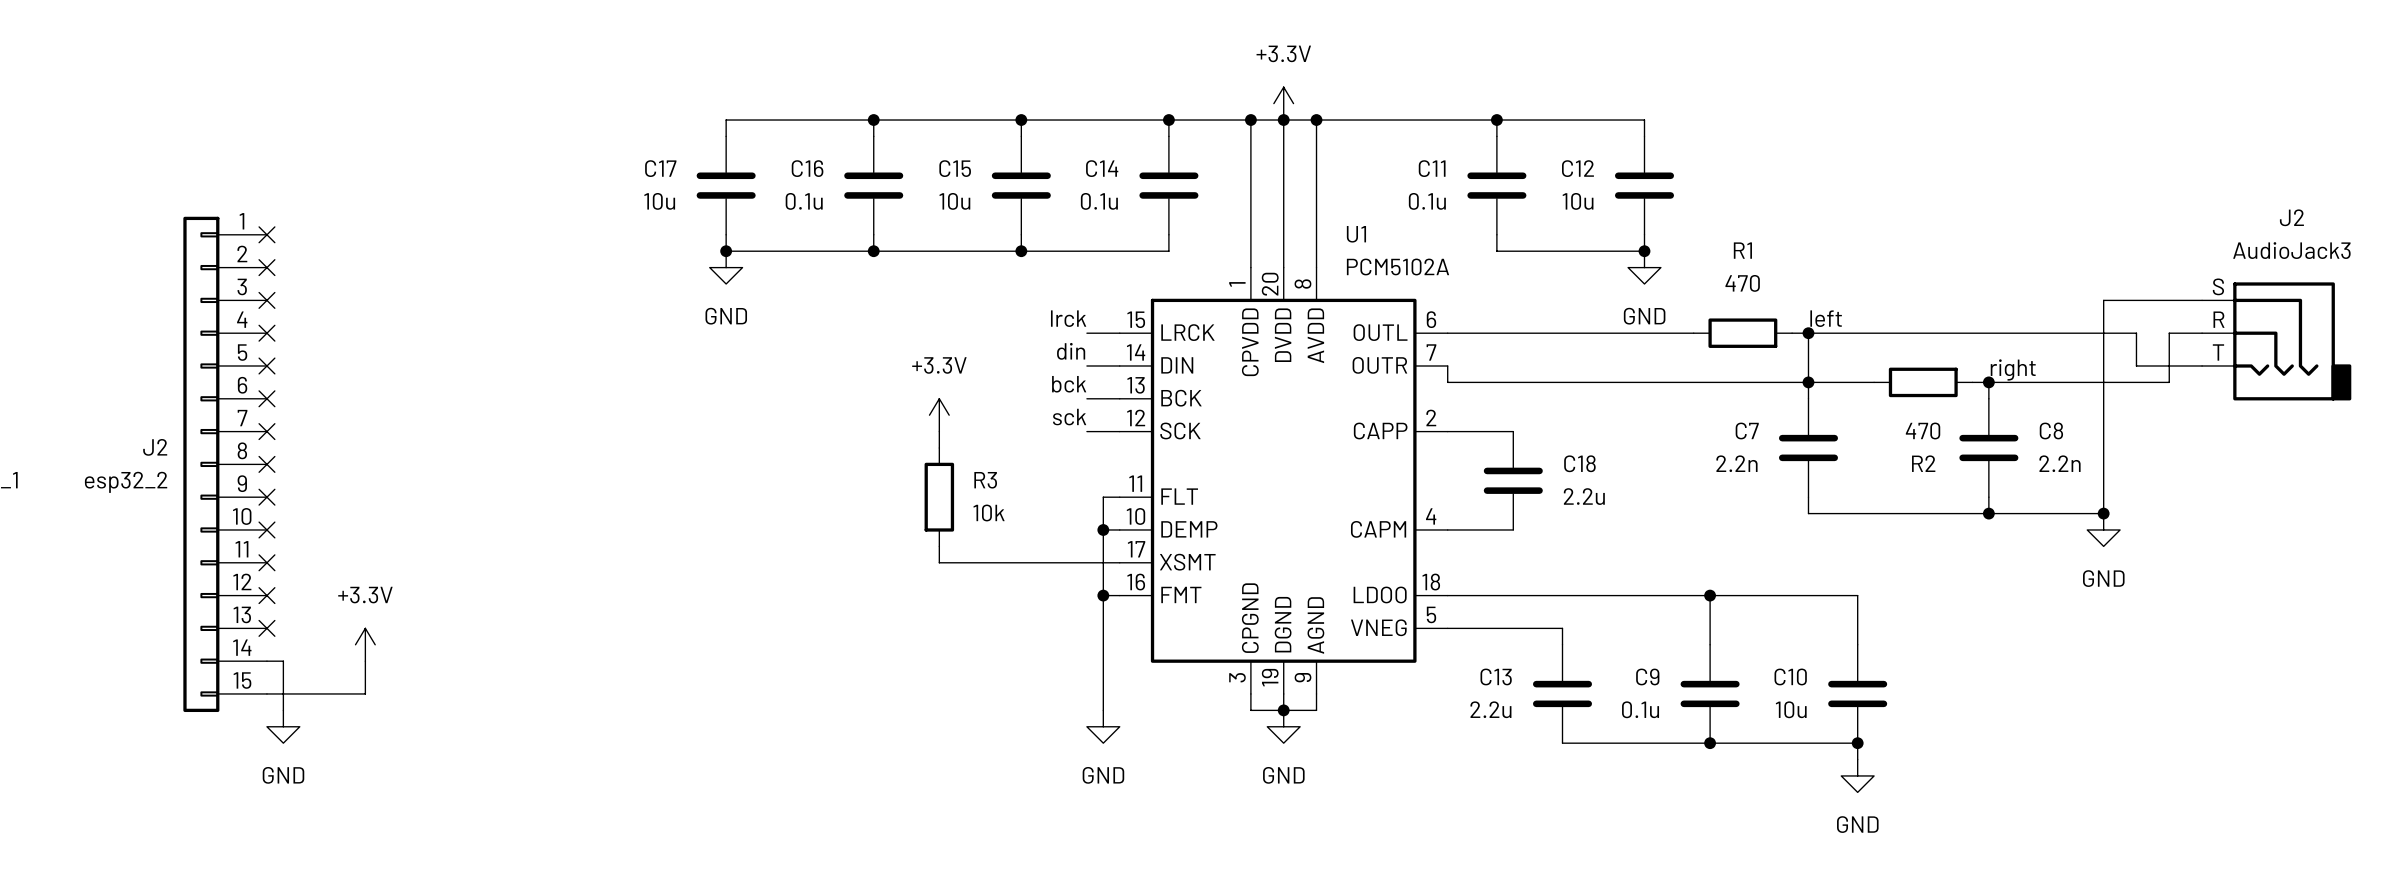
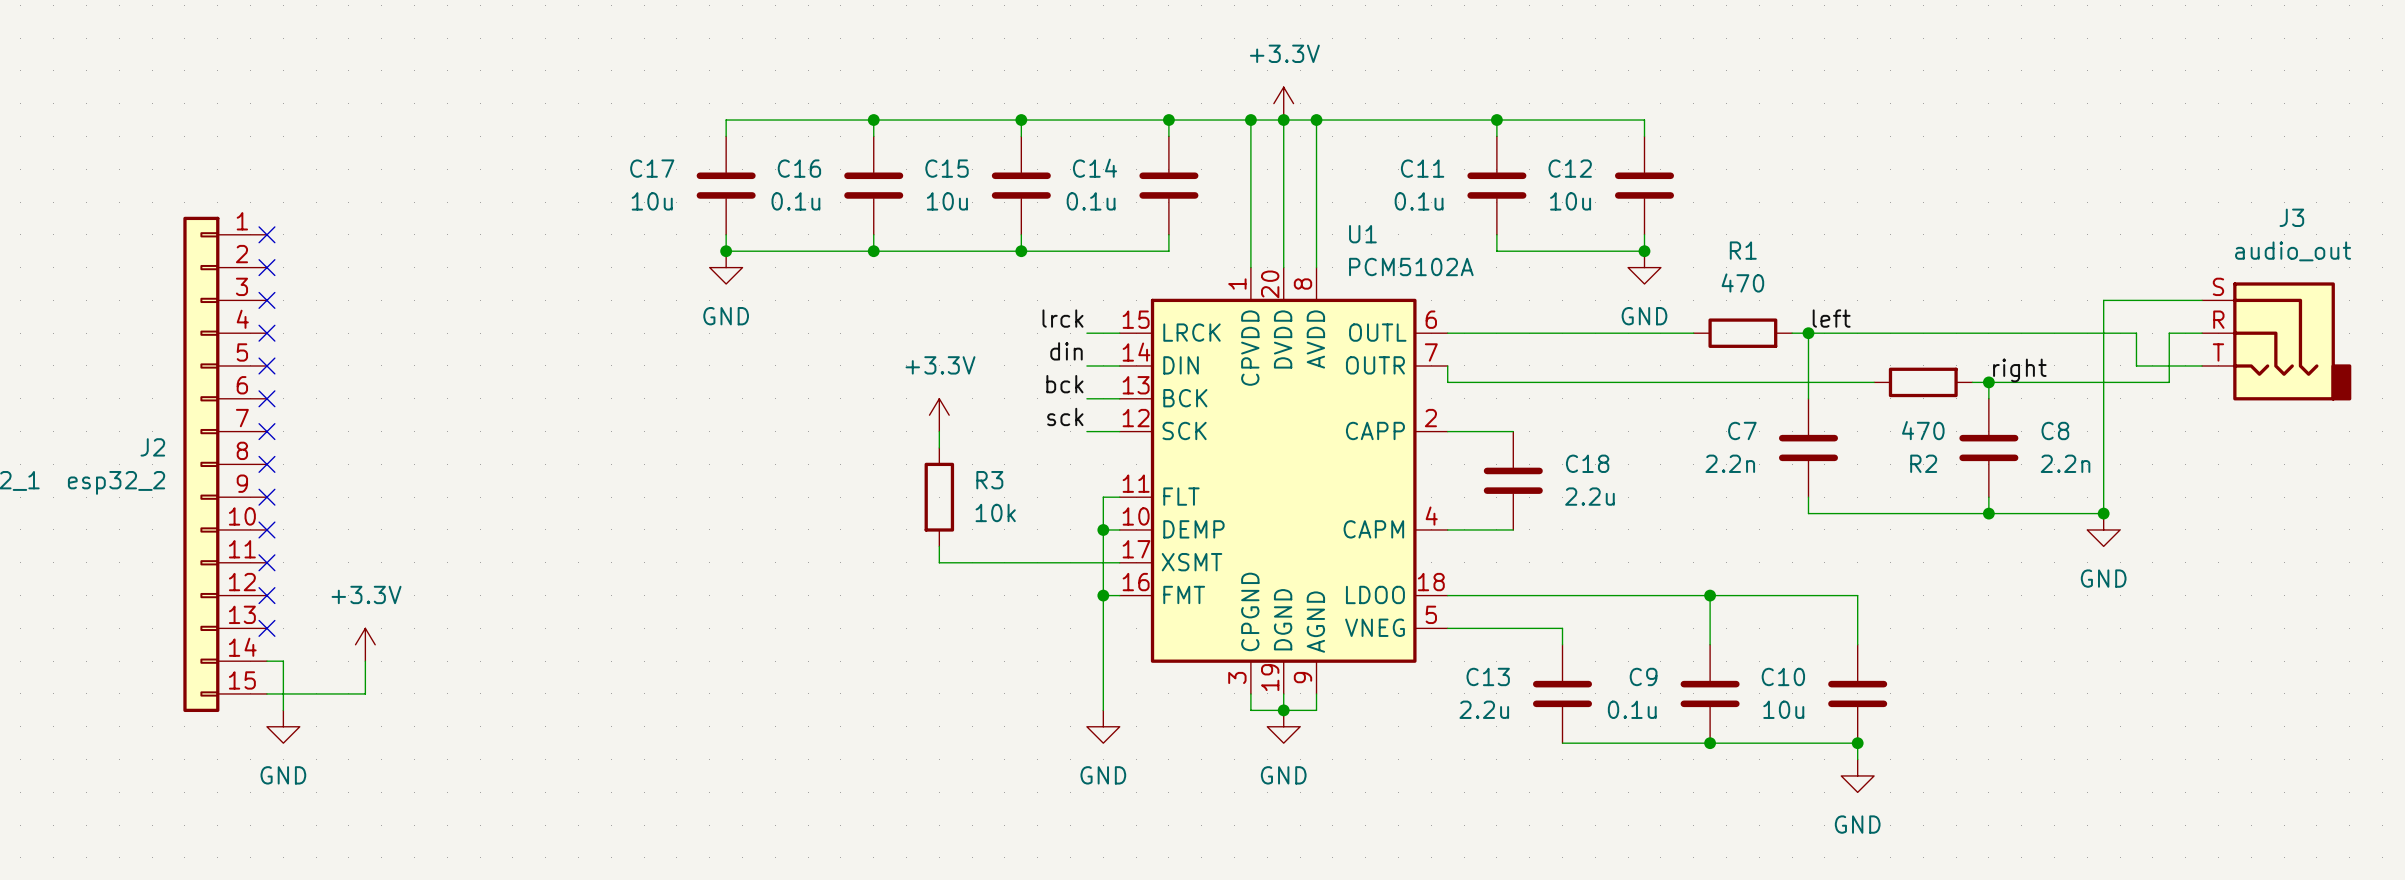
J2 name: J2 (2291, 217) -> J3 (2291, 217)
J2 value: AudioJack3 (2291, 250) -> audio_out (2293, 251)
junction: (1808, 382) -> none

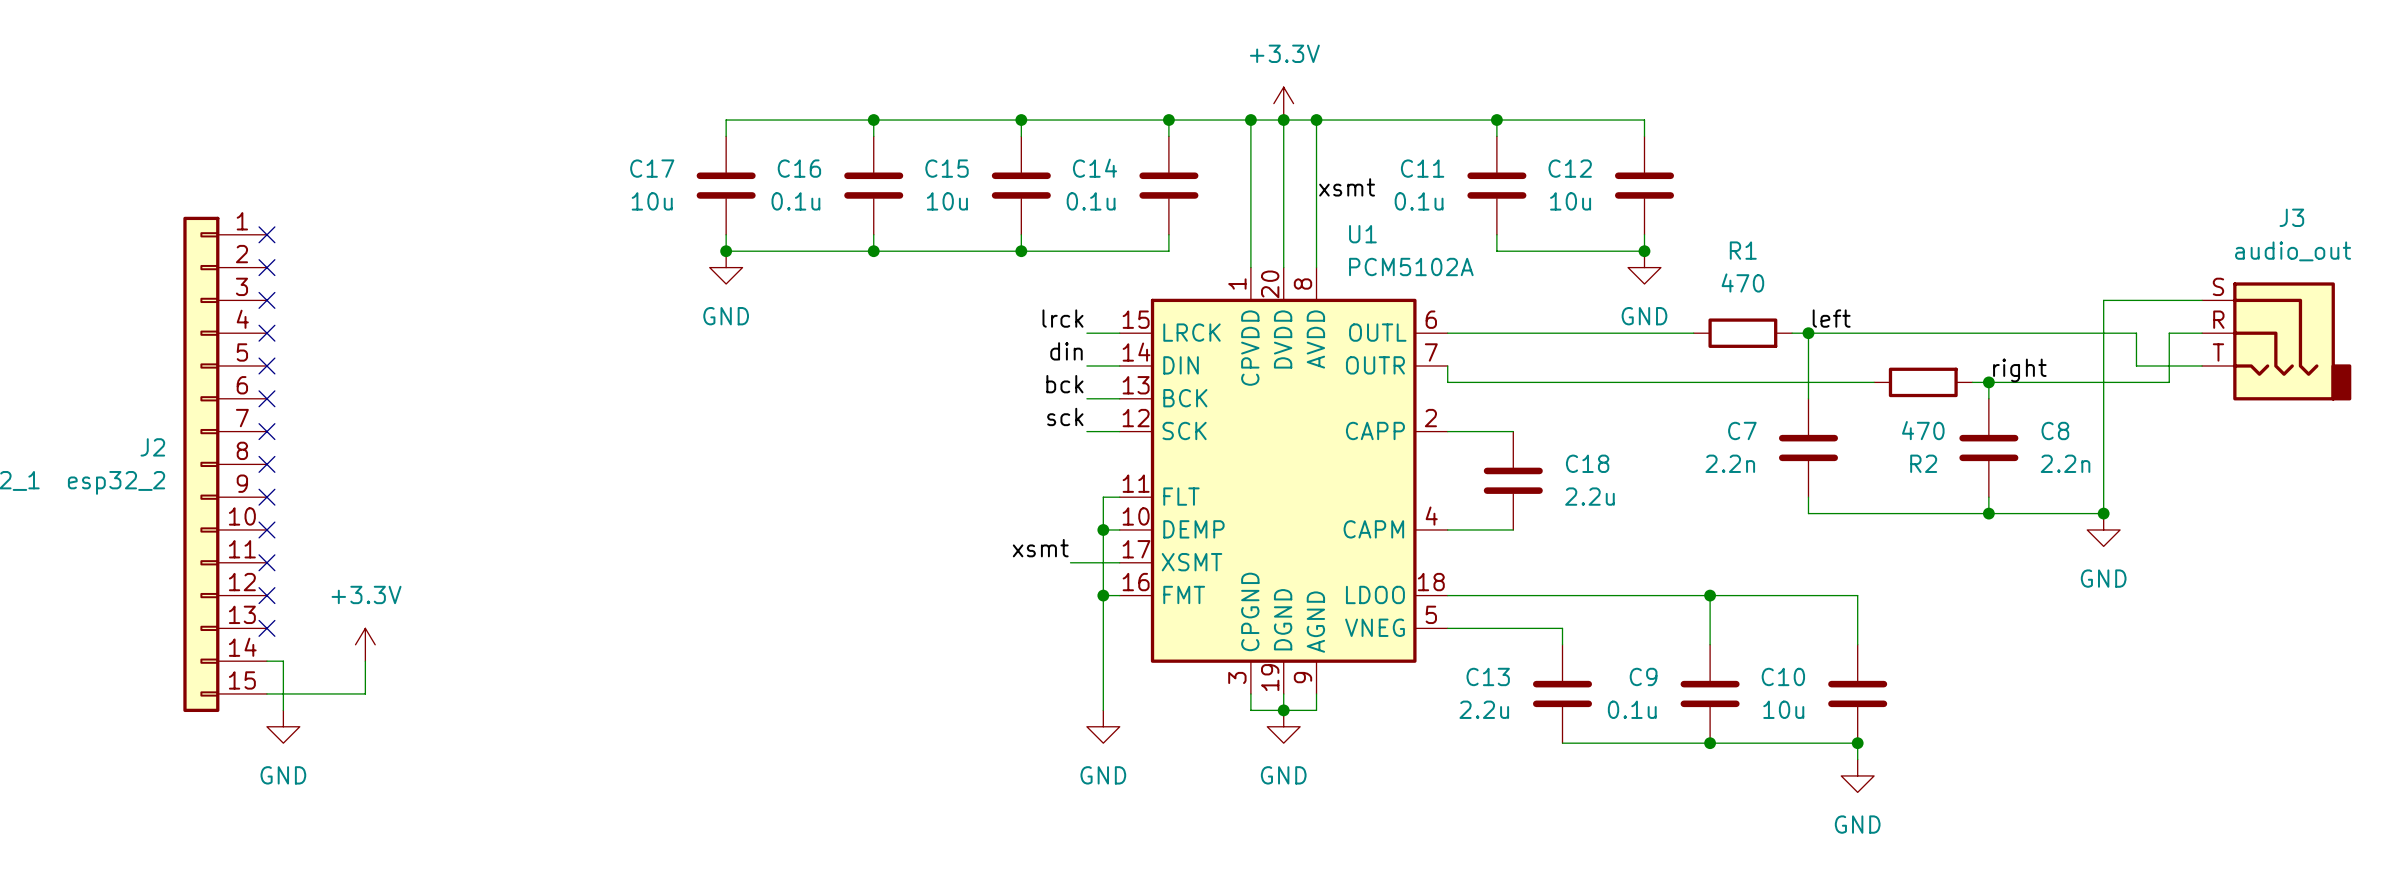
label: none -> xsmt (1347, 187)
power symbol: +3.3V (939, 415) -> none
wire: (939, 431) (939, 447) -> none
R3: 10k (939, 497) -> none
wire: (939, 546) (939, 562) (1070, 562) -> none
label: none -> xsmt (1040, 548)

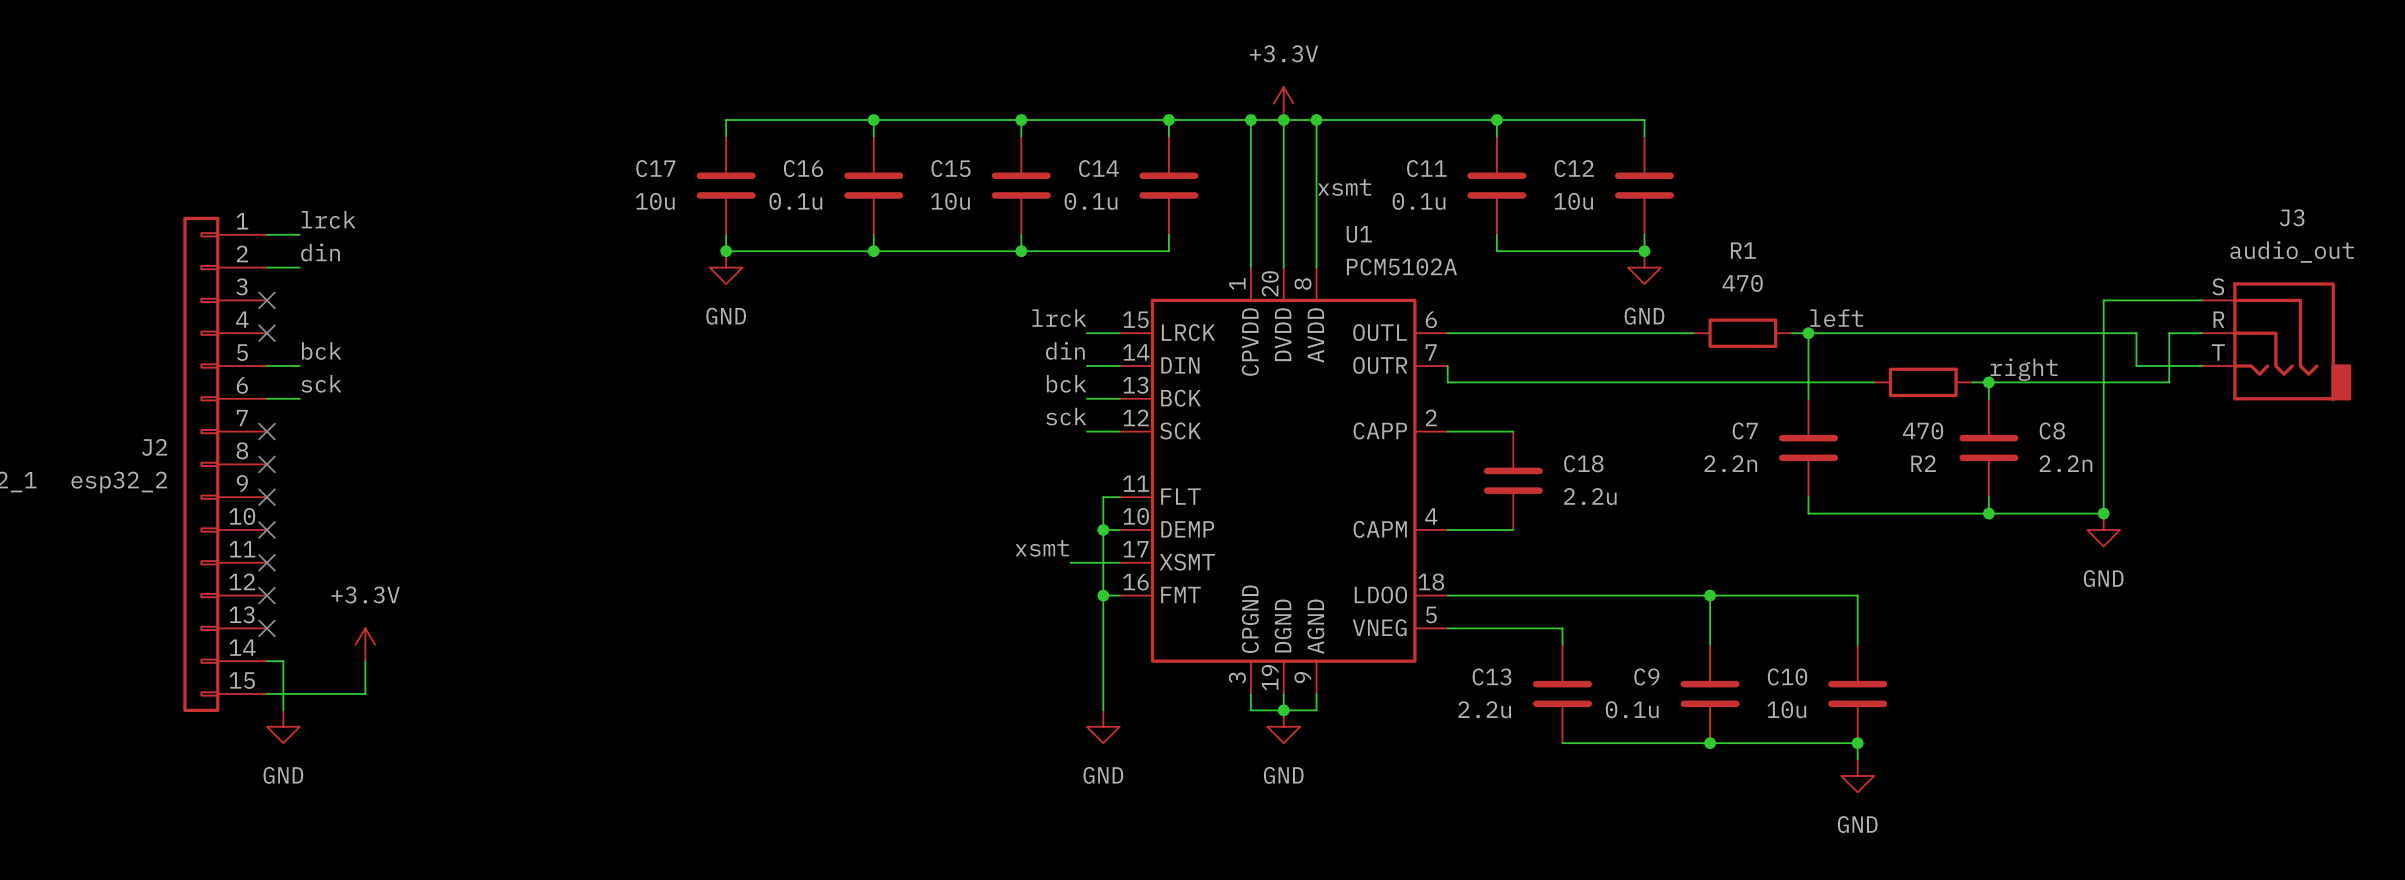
label: none -> lrck (328, 219)
wire: none -> (266, 234) (299, 234)
no-connect mark: (266, 234) -> none
label: none -> din (320, 252)
wire: none -> (266, 267) (299, 267)
no-connect mark: (266, 267) -> none
label: none -> bck (321, 351)
wire: none -> (266, 365) (299, 365)
no-connect mark: (266, 365) -> none
label: none -> sck (321, 383)
wire: none -> (266, 398) (299, 398)
no-connect mark: (266, 398) -> none

